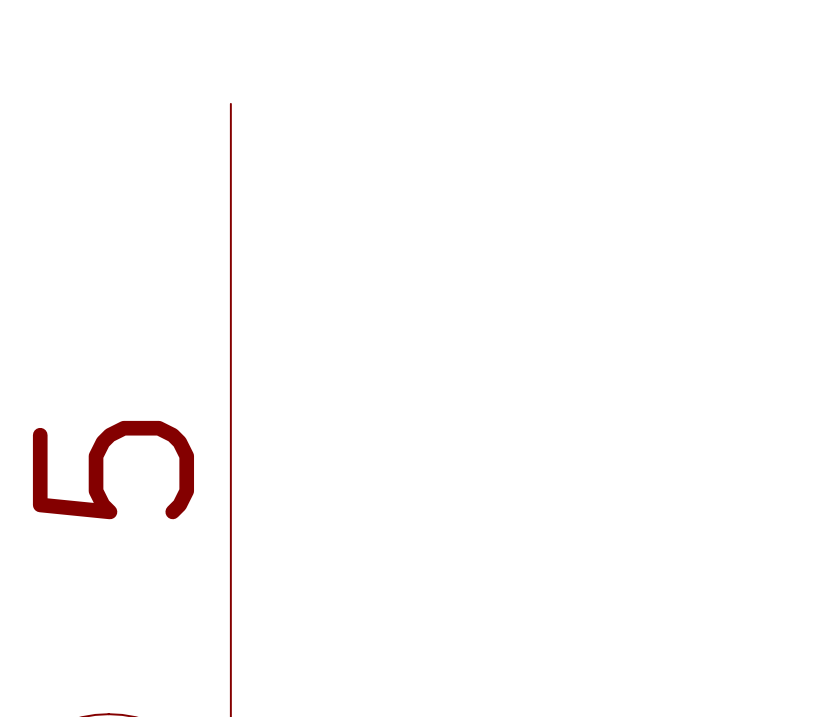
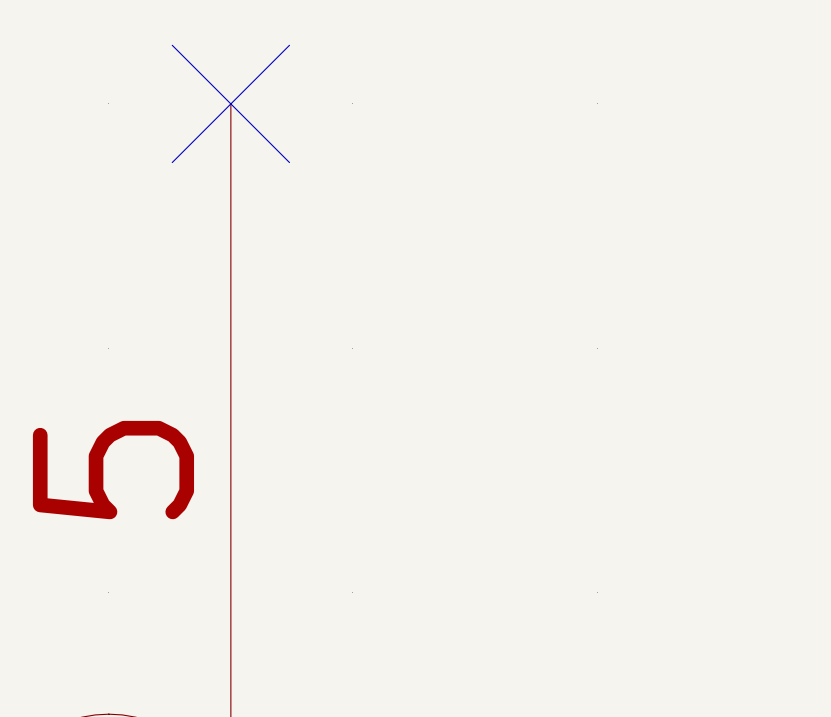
no-connect mark: none -> (230, 103)

